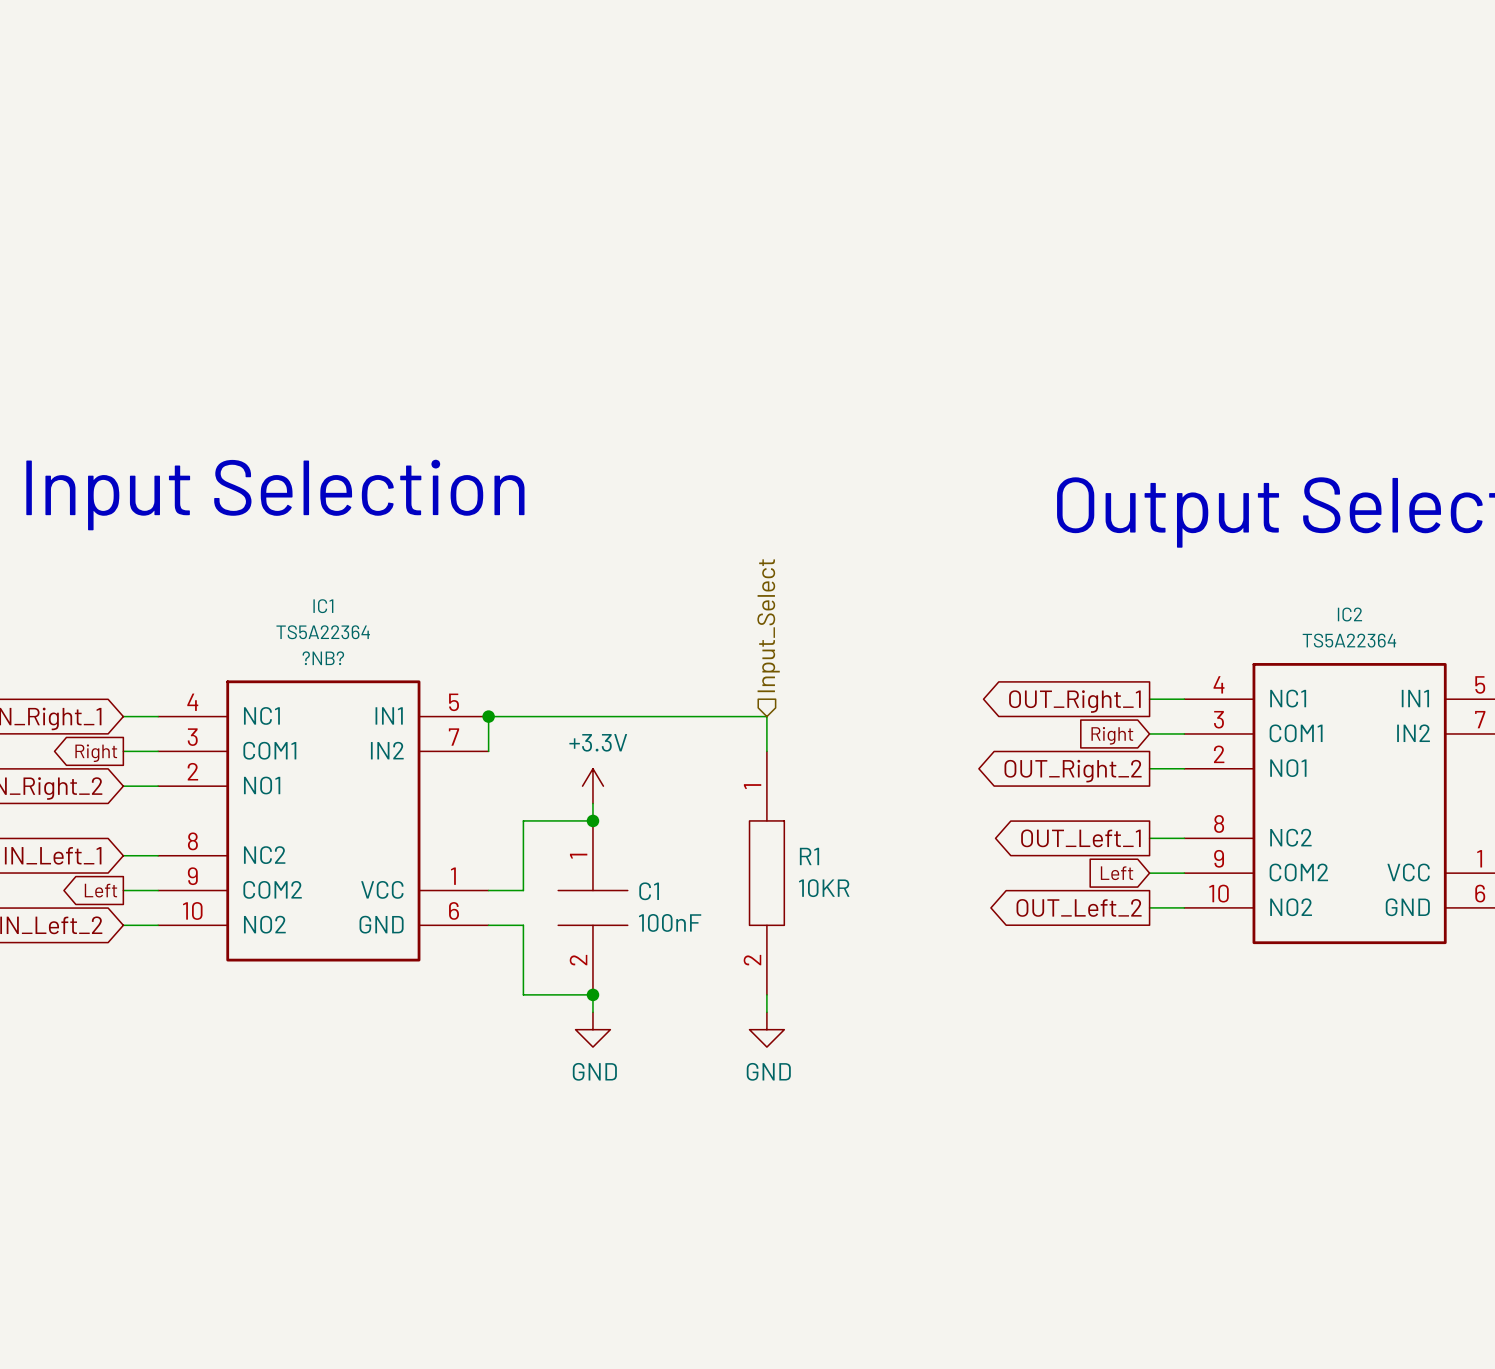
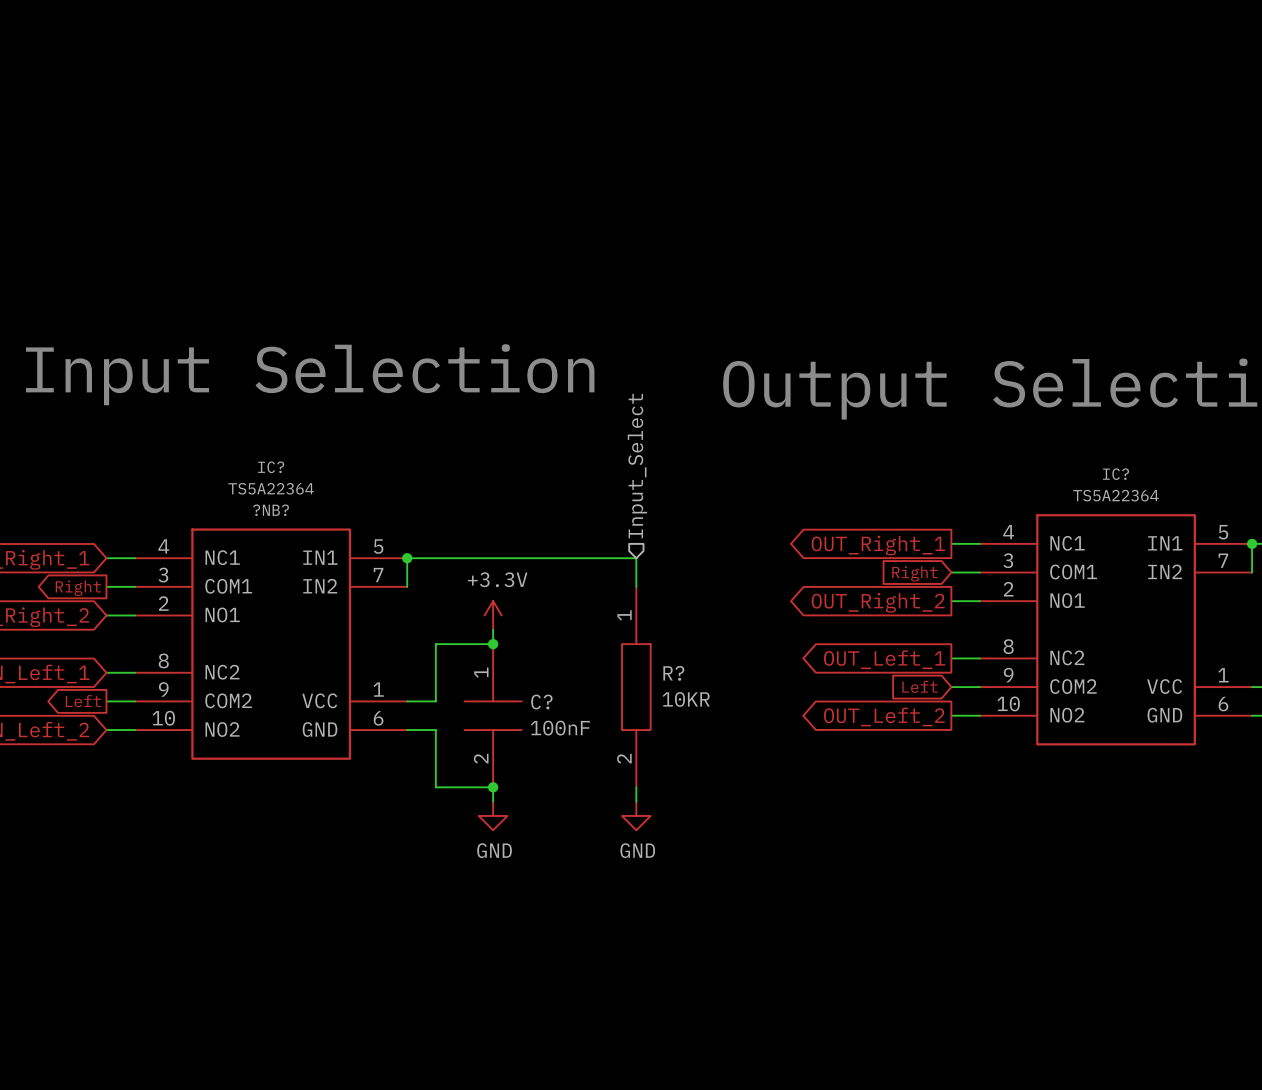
IC1 name: IC1 (323, 606) -> IC? (271, 467)
IC2 name: IC2 (1349, 614) -> IC? (1116, 474)
R1 name: R1 (809, 856) -> R? (673, 673)
C1 name: C1 (649, 891) -> C? (541, 702)

